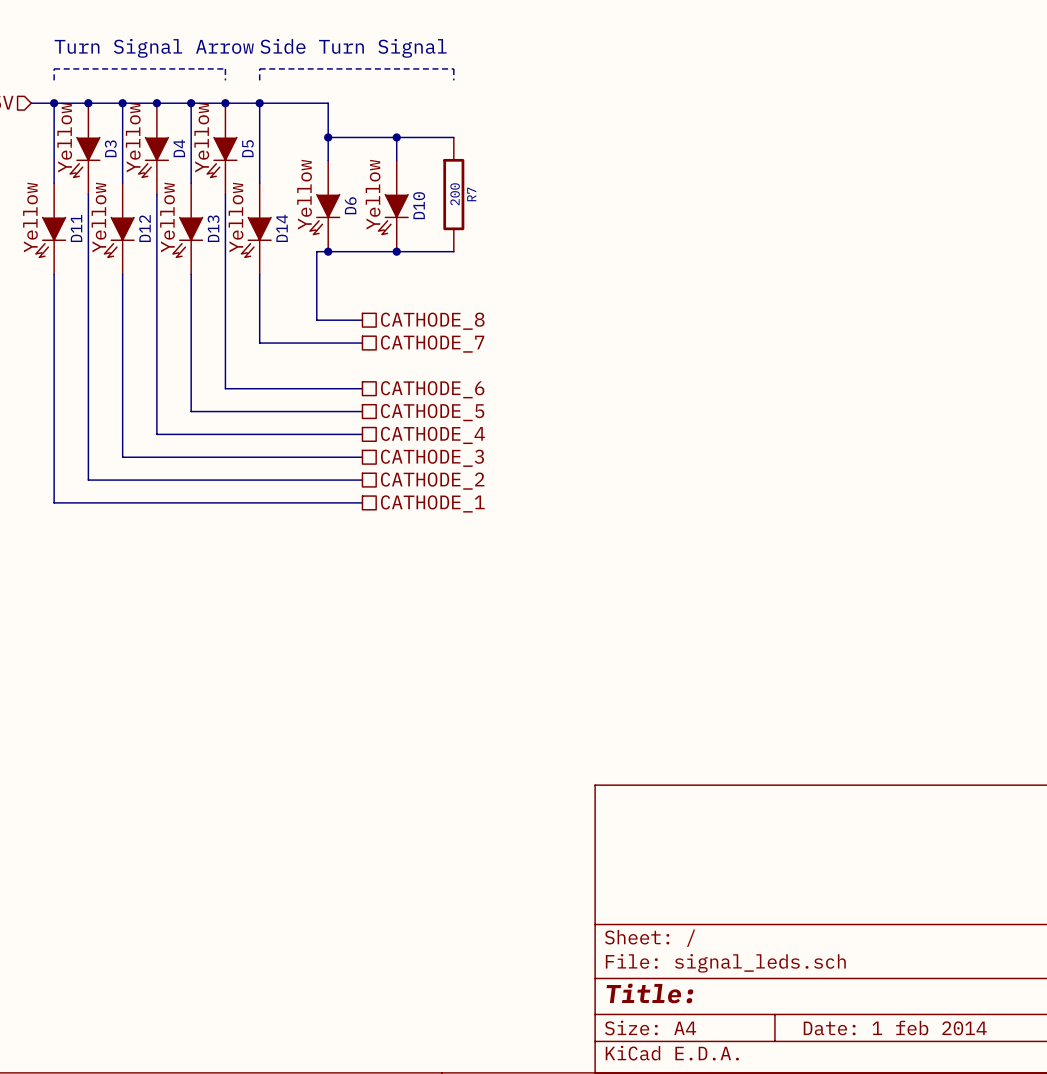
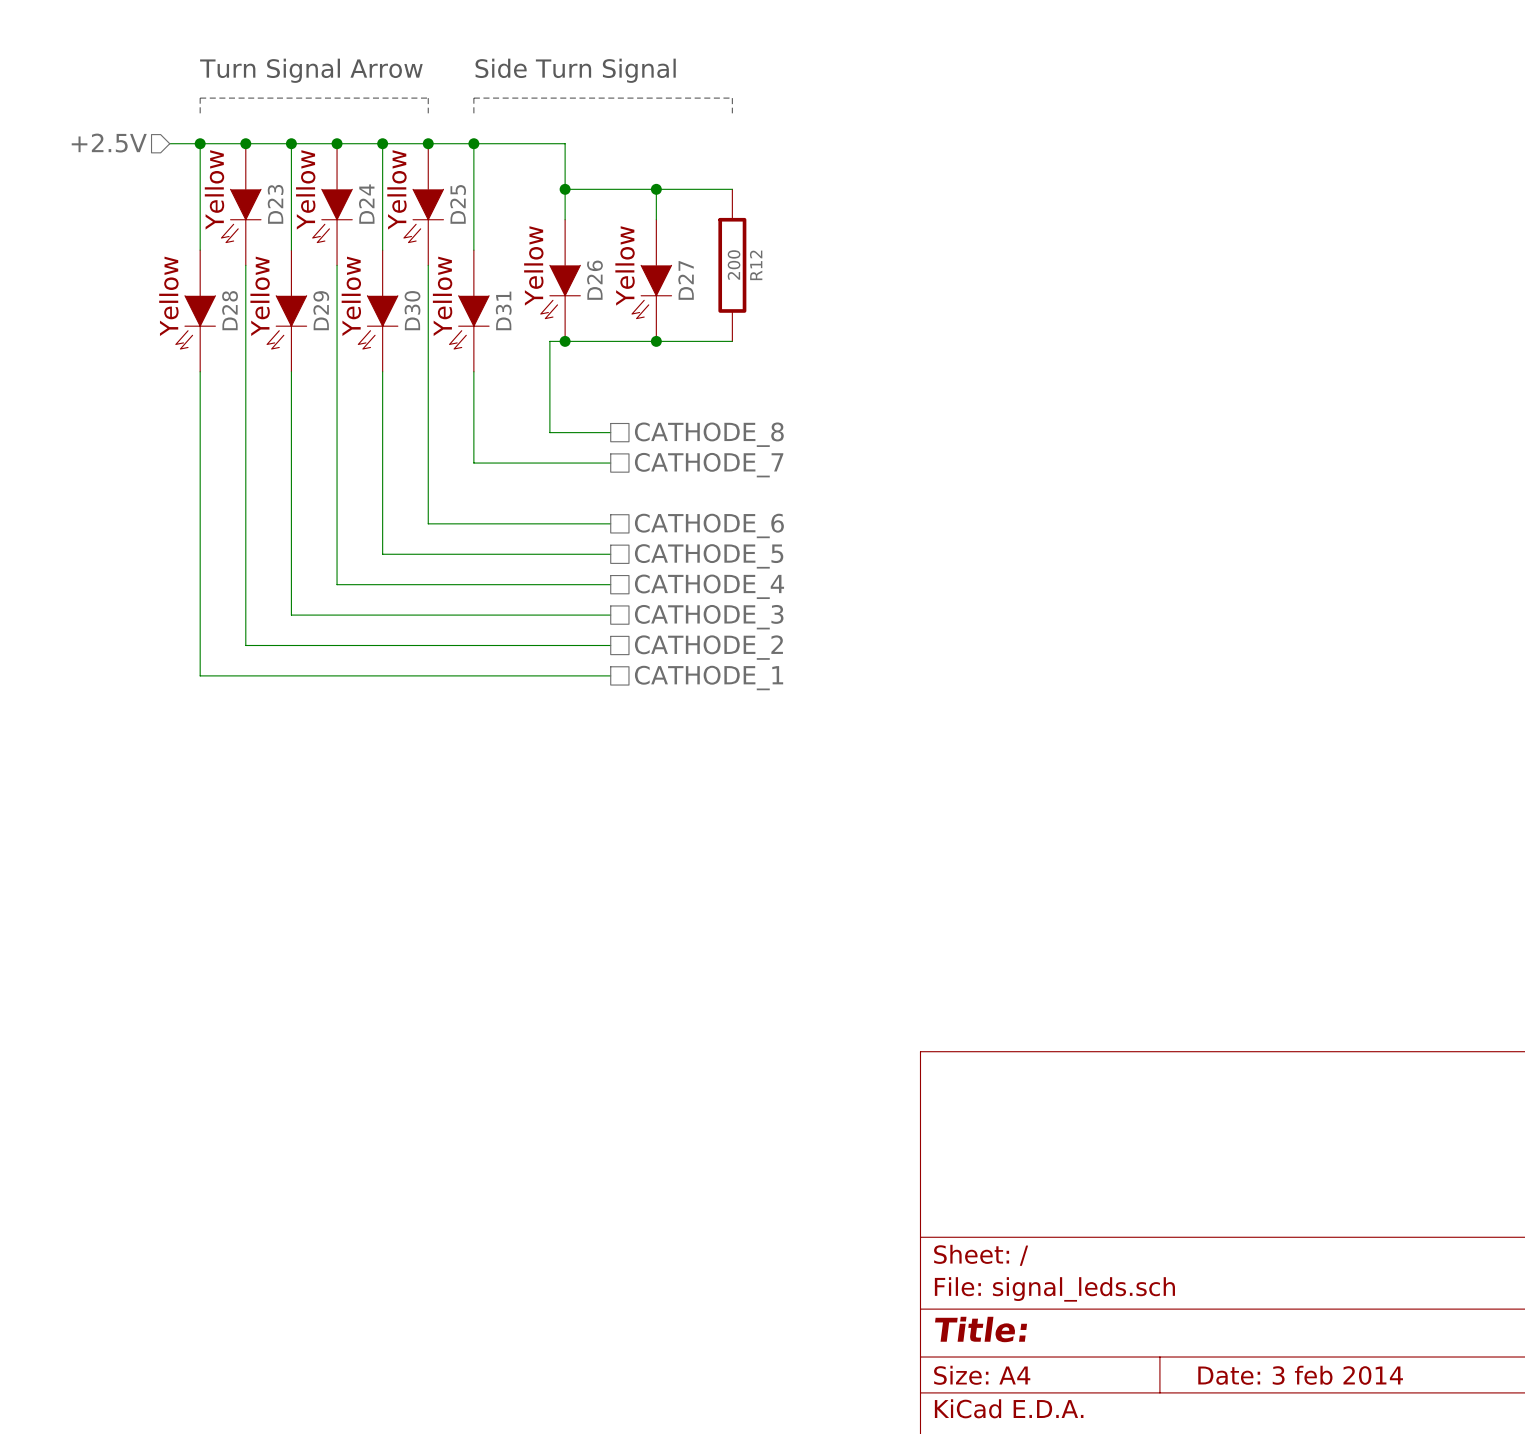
D3 name: D3 (110, 148) -> D23 (275, 204)
D4 name: D4 (179, 148) -> D24 (366, 204)
D5 name: D5 (247, 148) -> D25 (458, 204)
R7 name: R7 (471, 194) -> R12 (756, 265)
D6 name: D6 (350, 205) -> D26 (594, 280)
D10 name: D10 (419, 205) -> D27 (686, 280)
D11 name: D11 (76, 228) -> D28 (230, 310)
D12 name: D12 (144, 228) -> D29 (321, 310)
D13 name: D13 (213, 228) -> D30 (412, 310)
D14 name: D14 (282, 228) -> D31 (503, 310)
title block: Date: 1 feb 2014 (895, 1028) -> Date: 3 feb 2014 (1300, 1375)

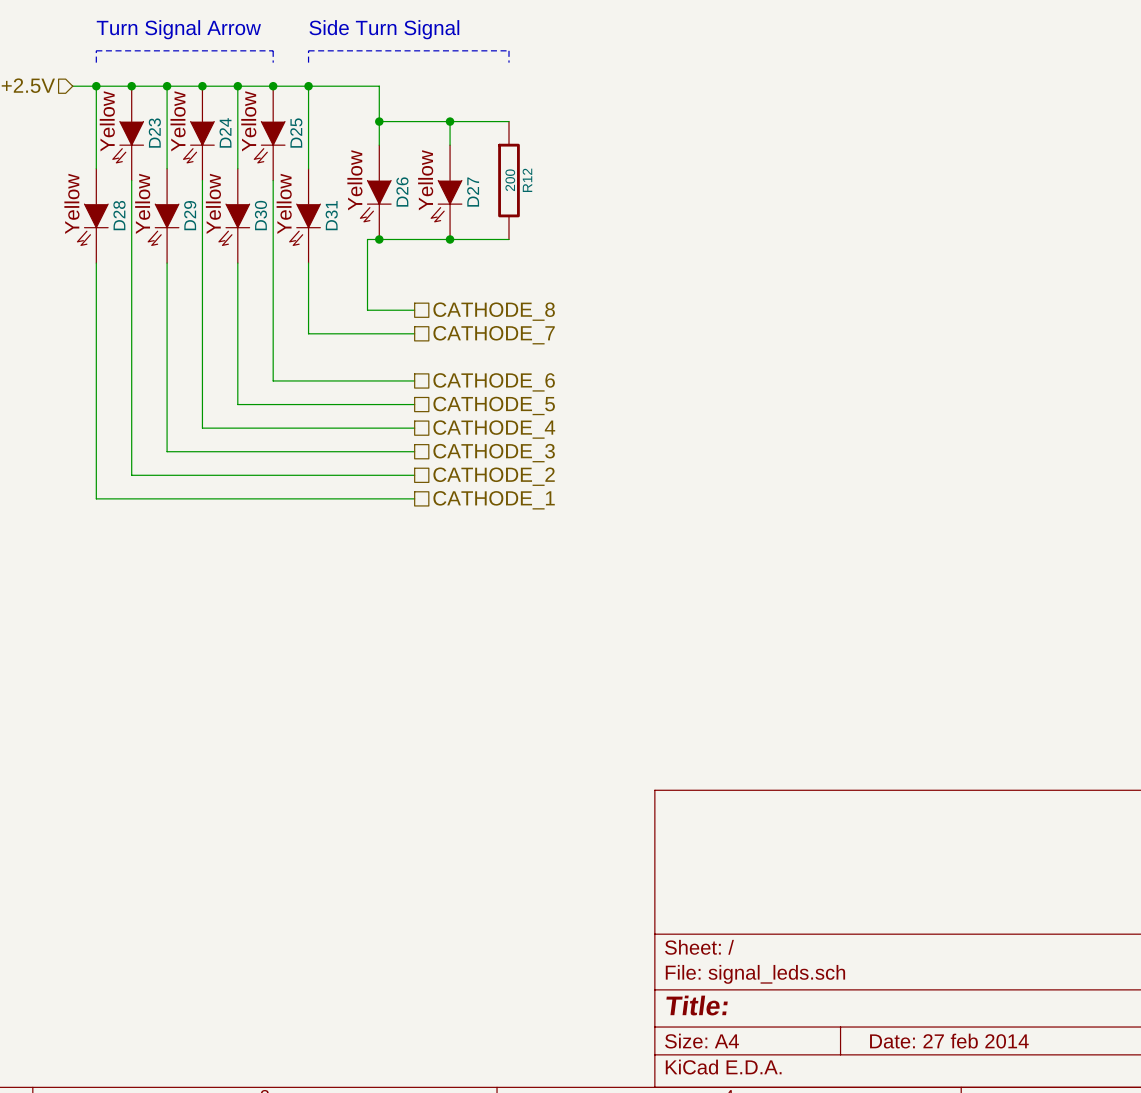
title block: Date: 3 feb 2014 (1300, 1375) -> Date: 27 feb 2014 (949, 1041)

